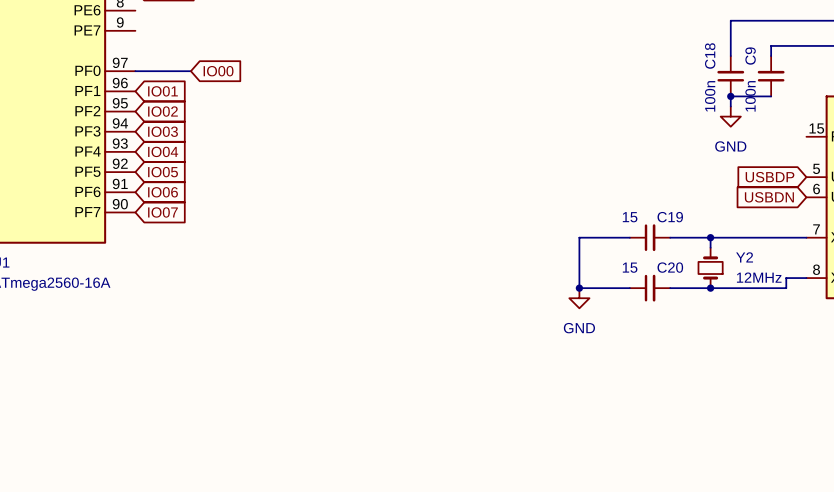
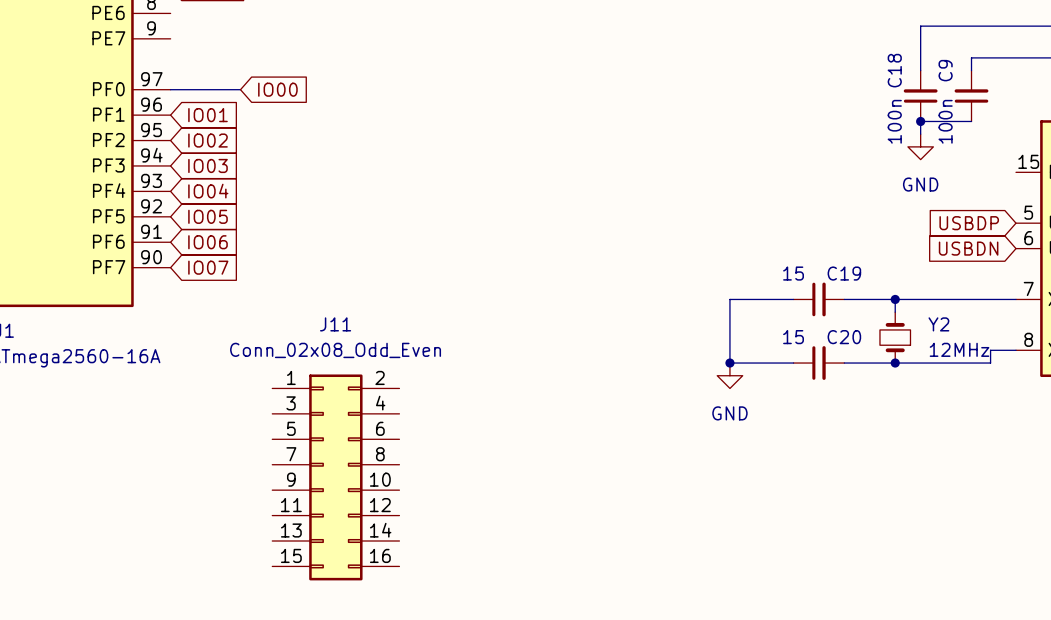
J11: none -> Conn_02x08_Odd_Even (335, 477)

